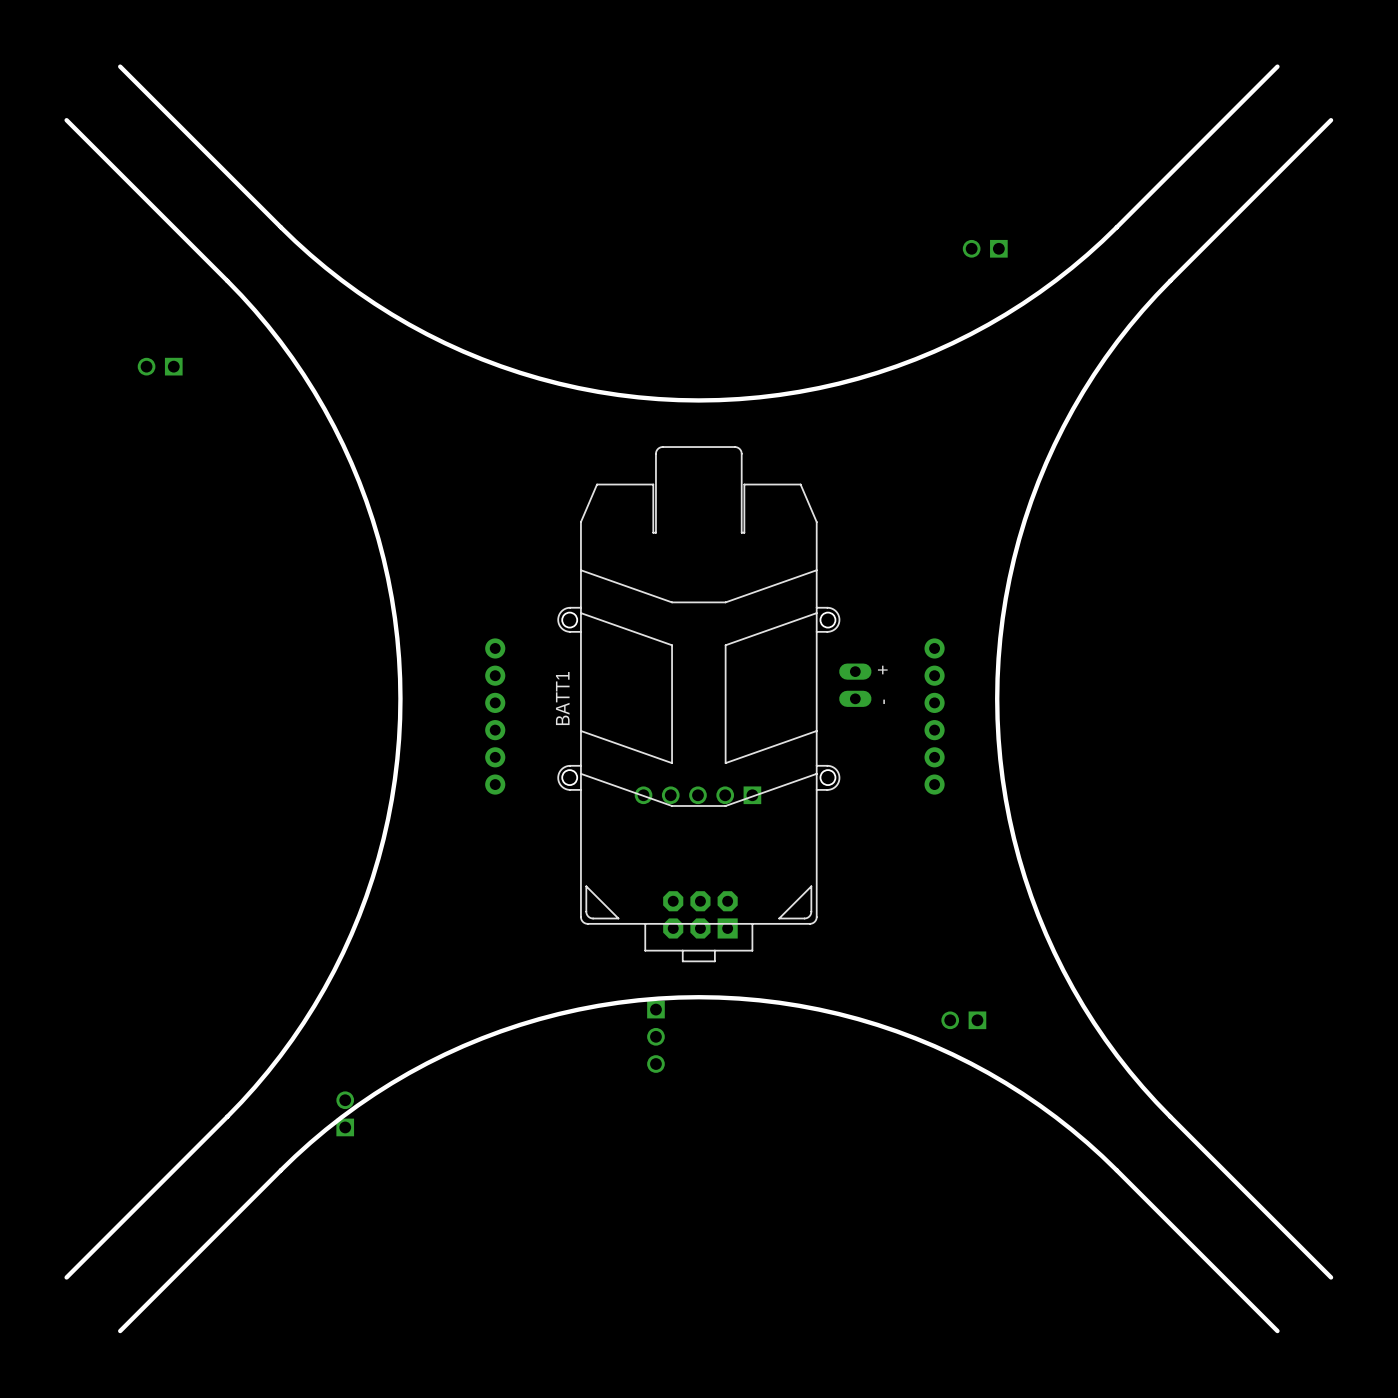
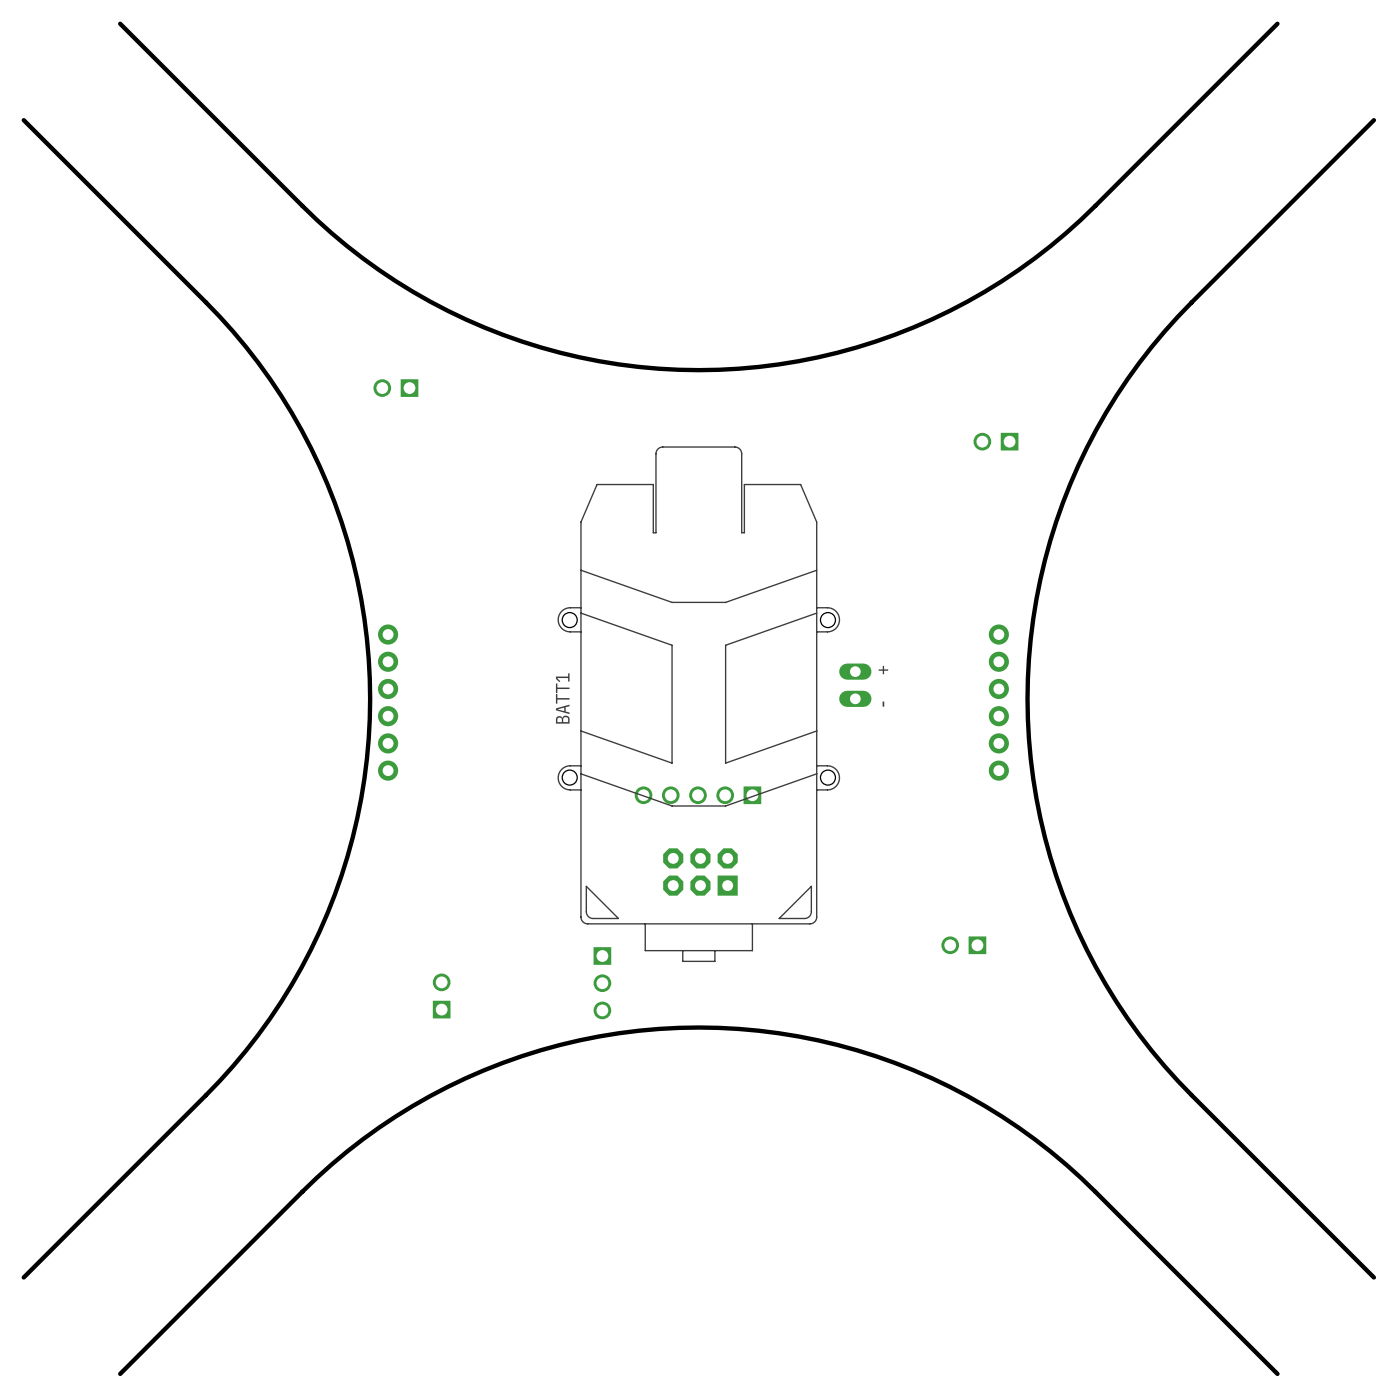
board edge: none -> (1277, 23) (1080, 219) (1034, 258) (984, 291) (913, 327) (837, 352) (758, 366) (698, 370) (638, 366) (560, 352) (484, 327) (412, 291) (362, 258) (316, 219) (120, 23)
board edge: (1277, 66) (1087, 254) (1039, 292) (988, 324) (934, 351) (858, 378) (779, 394) (698, 400) (618, 394) (539, 378) (463, 351) (409, 324) (358, 292) (310, 254) (120, 66) -> none
board edge: none -> (23, 120) (219, 316) (258, 362) (291, 412) (327, 484) (352, 560) (366, 638) (370, 698) (366, 758) (352, 837) (327, 913) (291, 984) (258, 1034) (219, 1080) (23, 1277)
board edge: (66, 120) (254, 310) (292, 358) (324, 409) (351, 463) (378, 539) (394, 618) (400, 698) (394, 779) (378, 858) (351, 934) (324, 988) (292, 1039) (254, 1087) (66, 1277) -> none
board edge: (1331, 120) (1142, 310) (1105, 358) (1073, 409) (1046, 463) (1019, 539) (1002, 618) (997, 698) (1002, 779) (1019, 858) (1046, 934) (1073, 988) (1105, 1039) (1142, 1087) (1331, 1277) -> none
board edge: none -> (1373, 120) (1177, 316) (1139, 362) (1106, 412) (1070, 484) (1044, 560) (1030, 638) (1027, 698) (1030, 758) (1044, 837) (1070, 913) (1106, 984) (1139, 1034) (1177, 1080) (1373, 1277)
part position: (985, 248) -> (995, 441)
part position: (160, 366) -> (395, 388)
part position: (495, 716) -> (388, 702)
part position: (934, 716) -> (998, 702)
part position: (700, 914) -> (700, 871)
part position: (963, 1020) -> (963, 945)
part position: (655, 1036) -> (602, 983)
part position: (345, 1113) -> (441, 995)
board edge: (1277, 1331) (1087, 1142) (1039, 1105) (988, 1073) (934, 1046) (858, 1019) (779, 1002) (698, 997) (618, 1002) (539, 1019) (463, 1046) (409, 1073) (358, 1105) (310, 1142) (120, 1331) -> none
board edge: none -> (1277, 1373) (1080, 1177) (1034, 1139) (984, 1106) (913, 1070) (837, 1044) (758, 1030) (698, 1027) (638, 1030) (560, 1044) (484, 1070) (412, 1106) (362, 1139) (316, 1177) (120, 1373)

